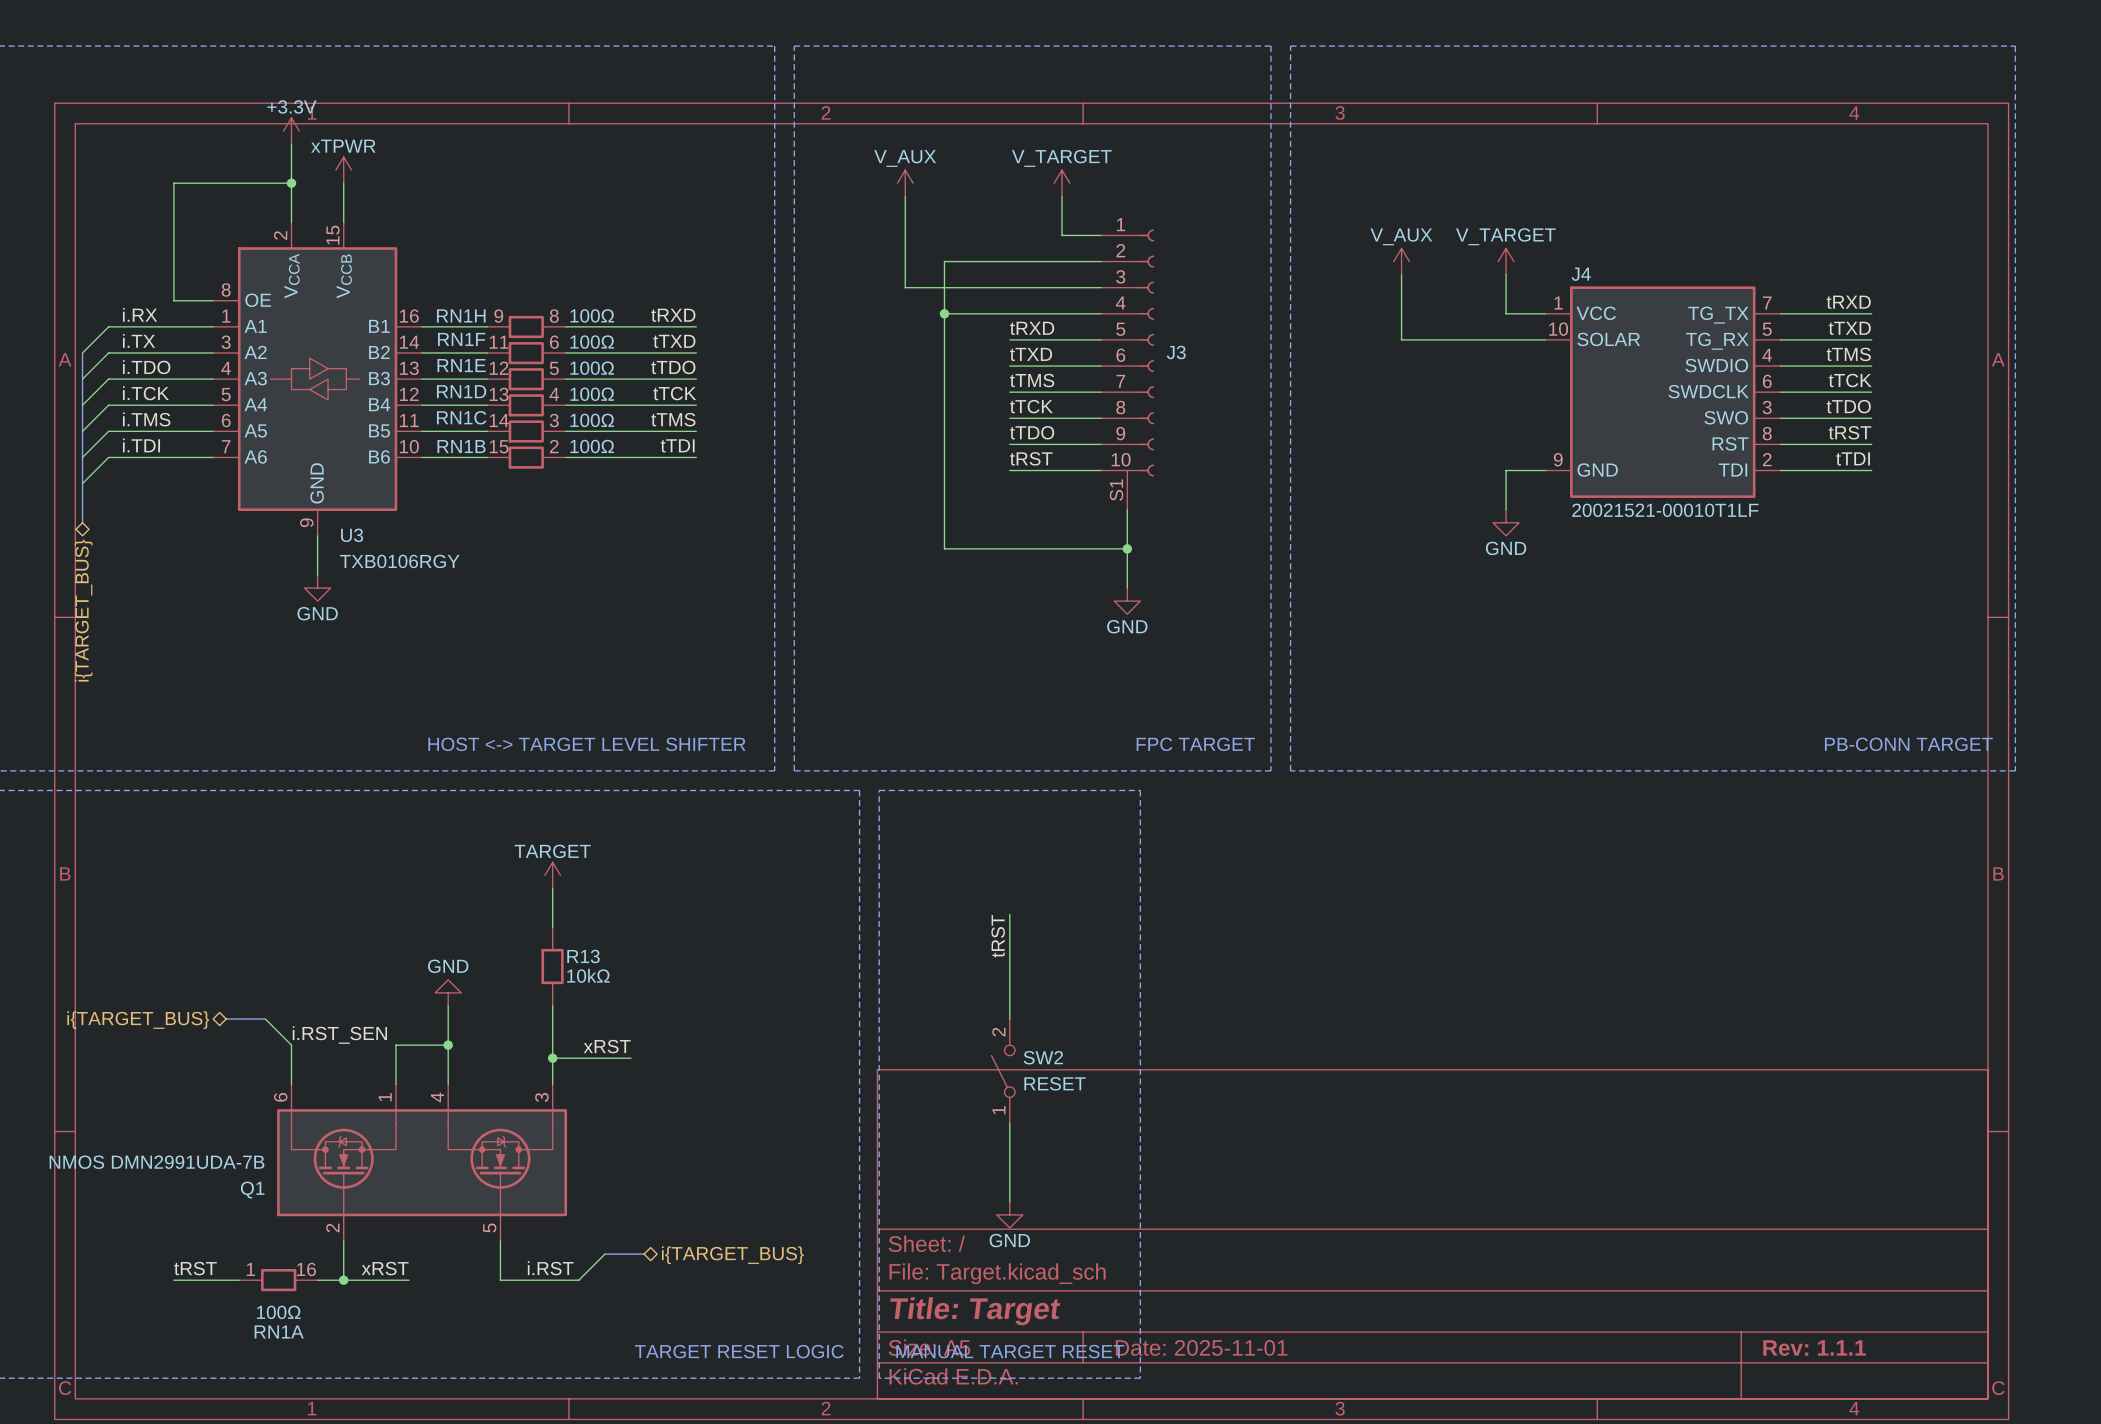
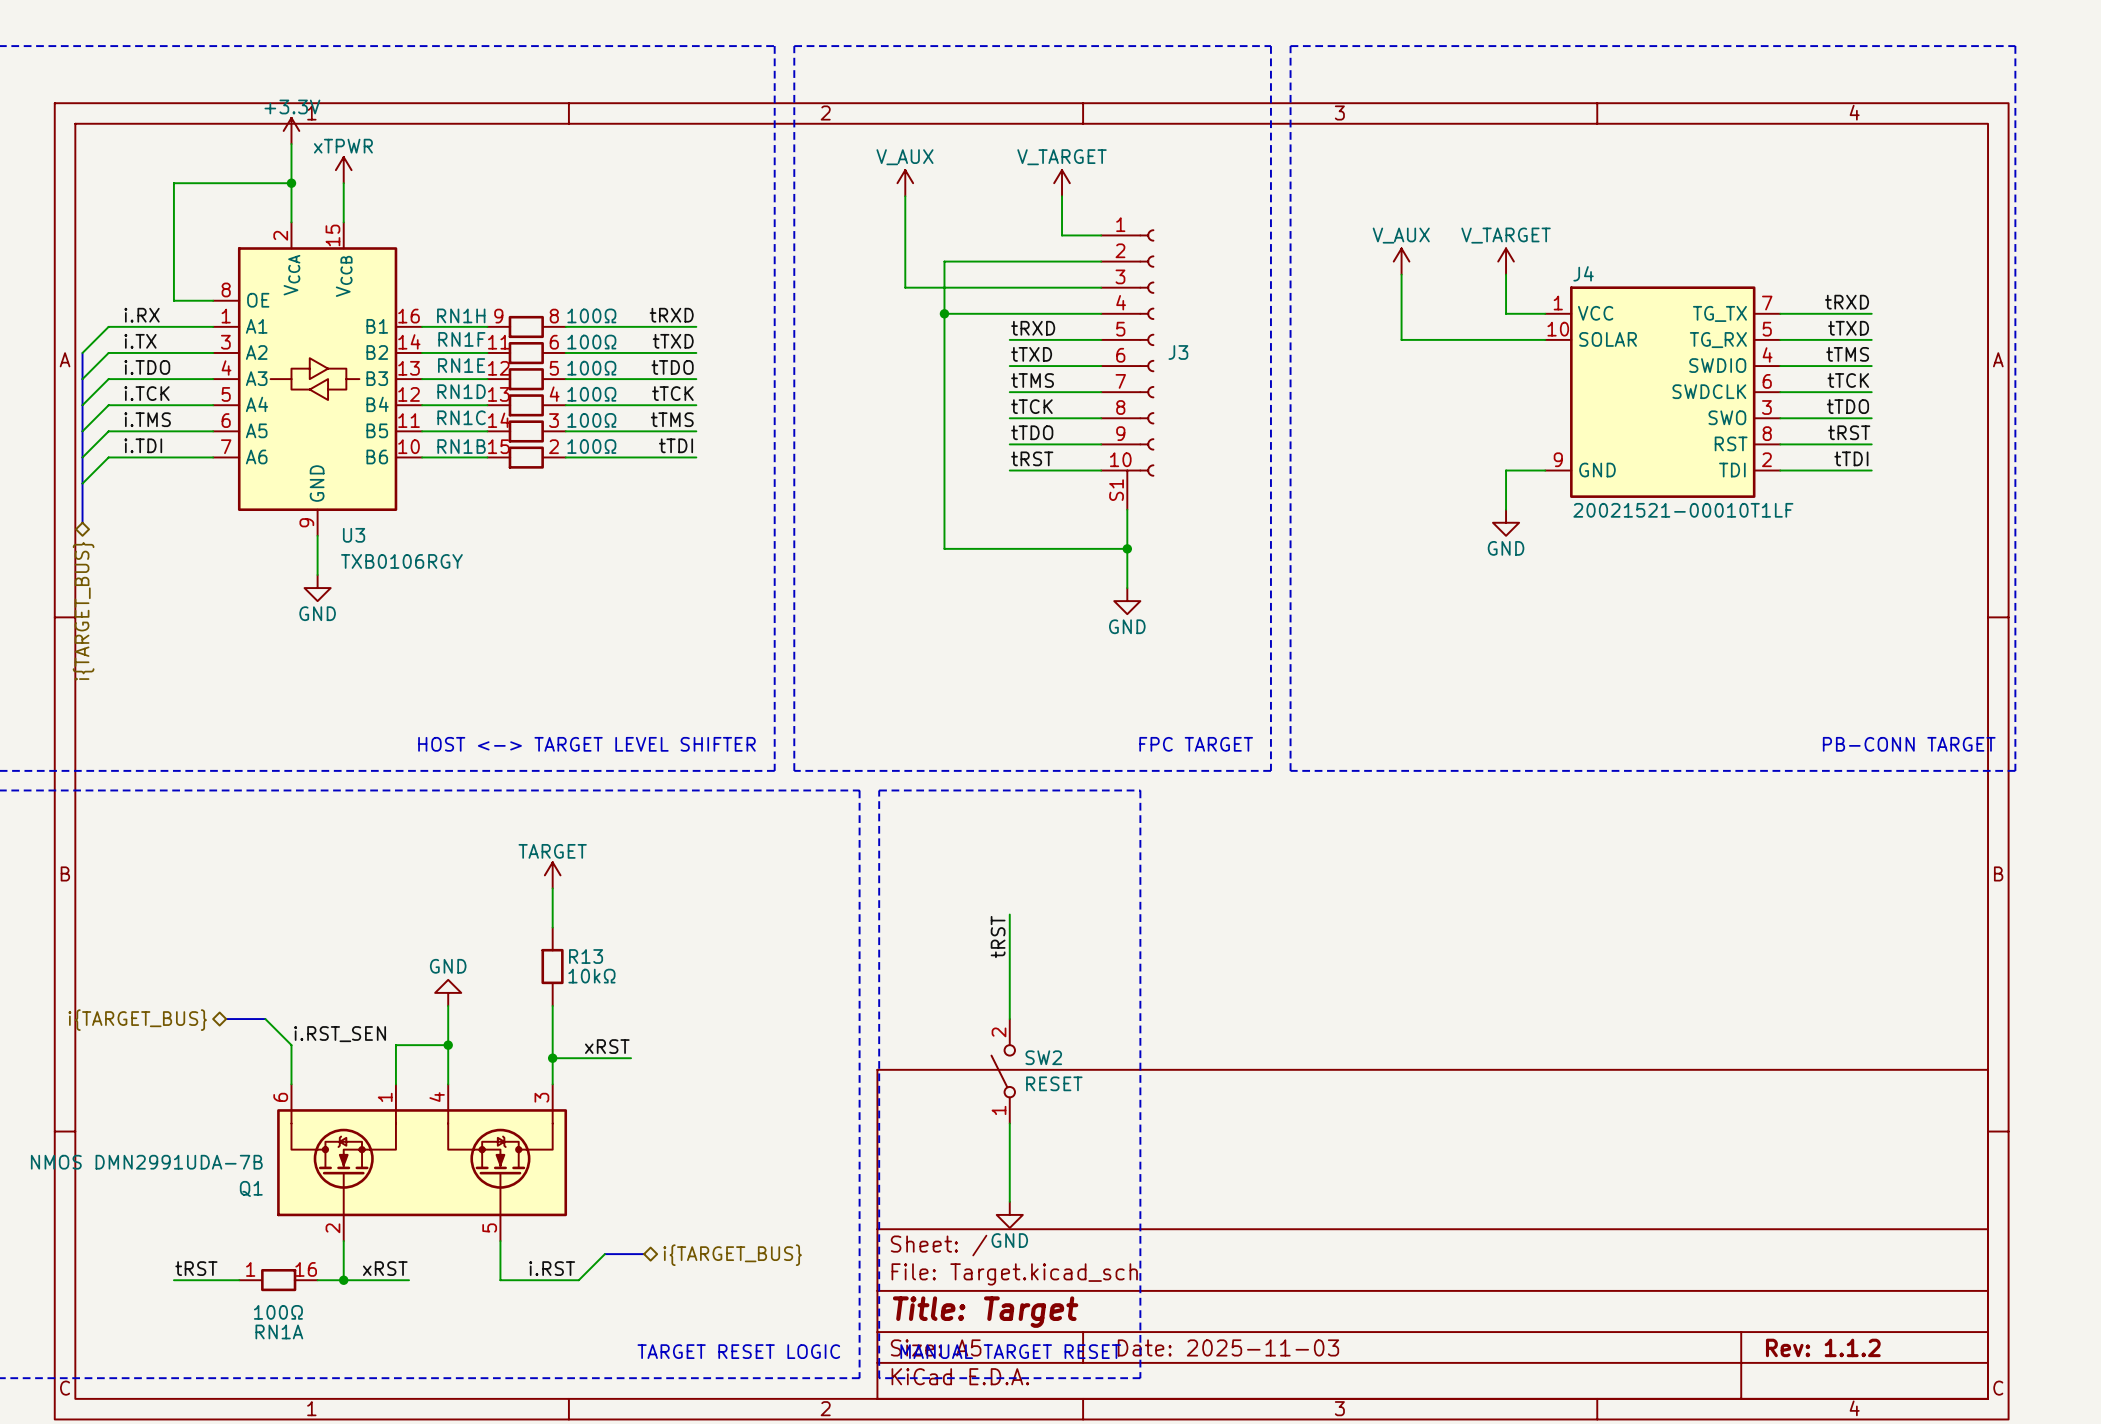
title block: Date: 2025-11-01 (1201, 1347) -> Date: 2025-11-03 (1228, 1347)
title block: Rev: 1.1.1 (1814, 1348) -> Rev: 1.1.2 (1823, 1347)

